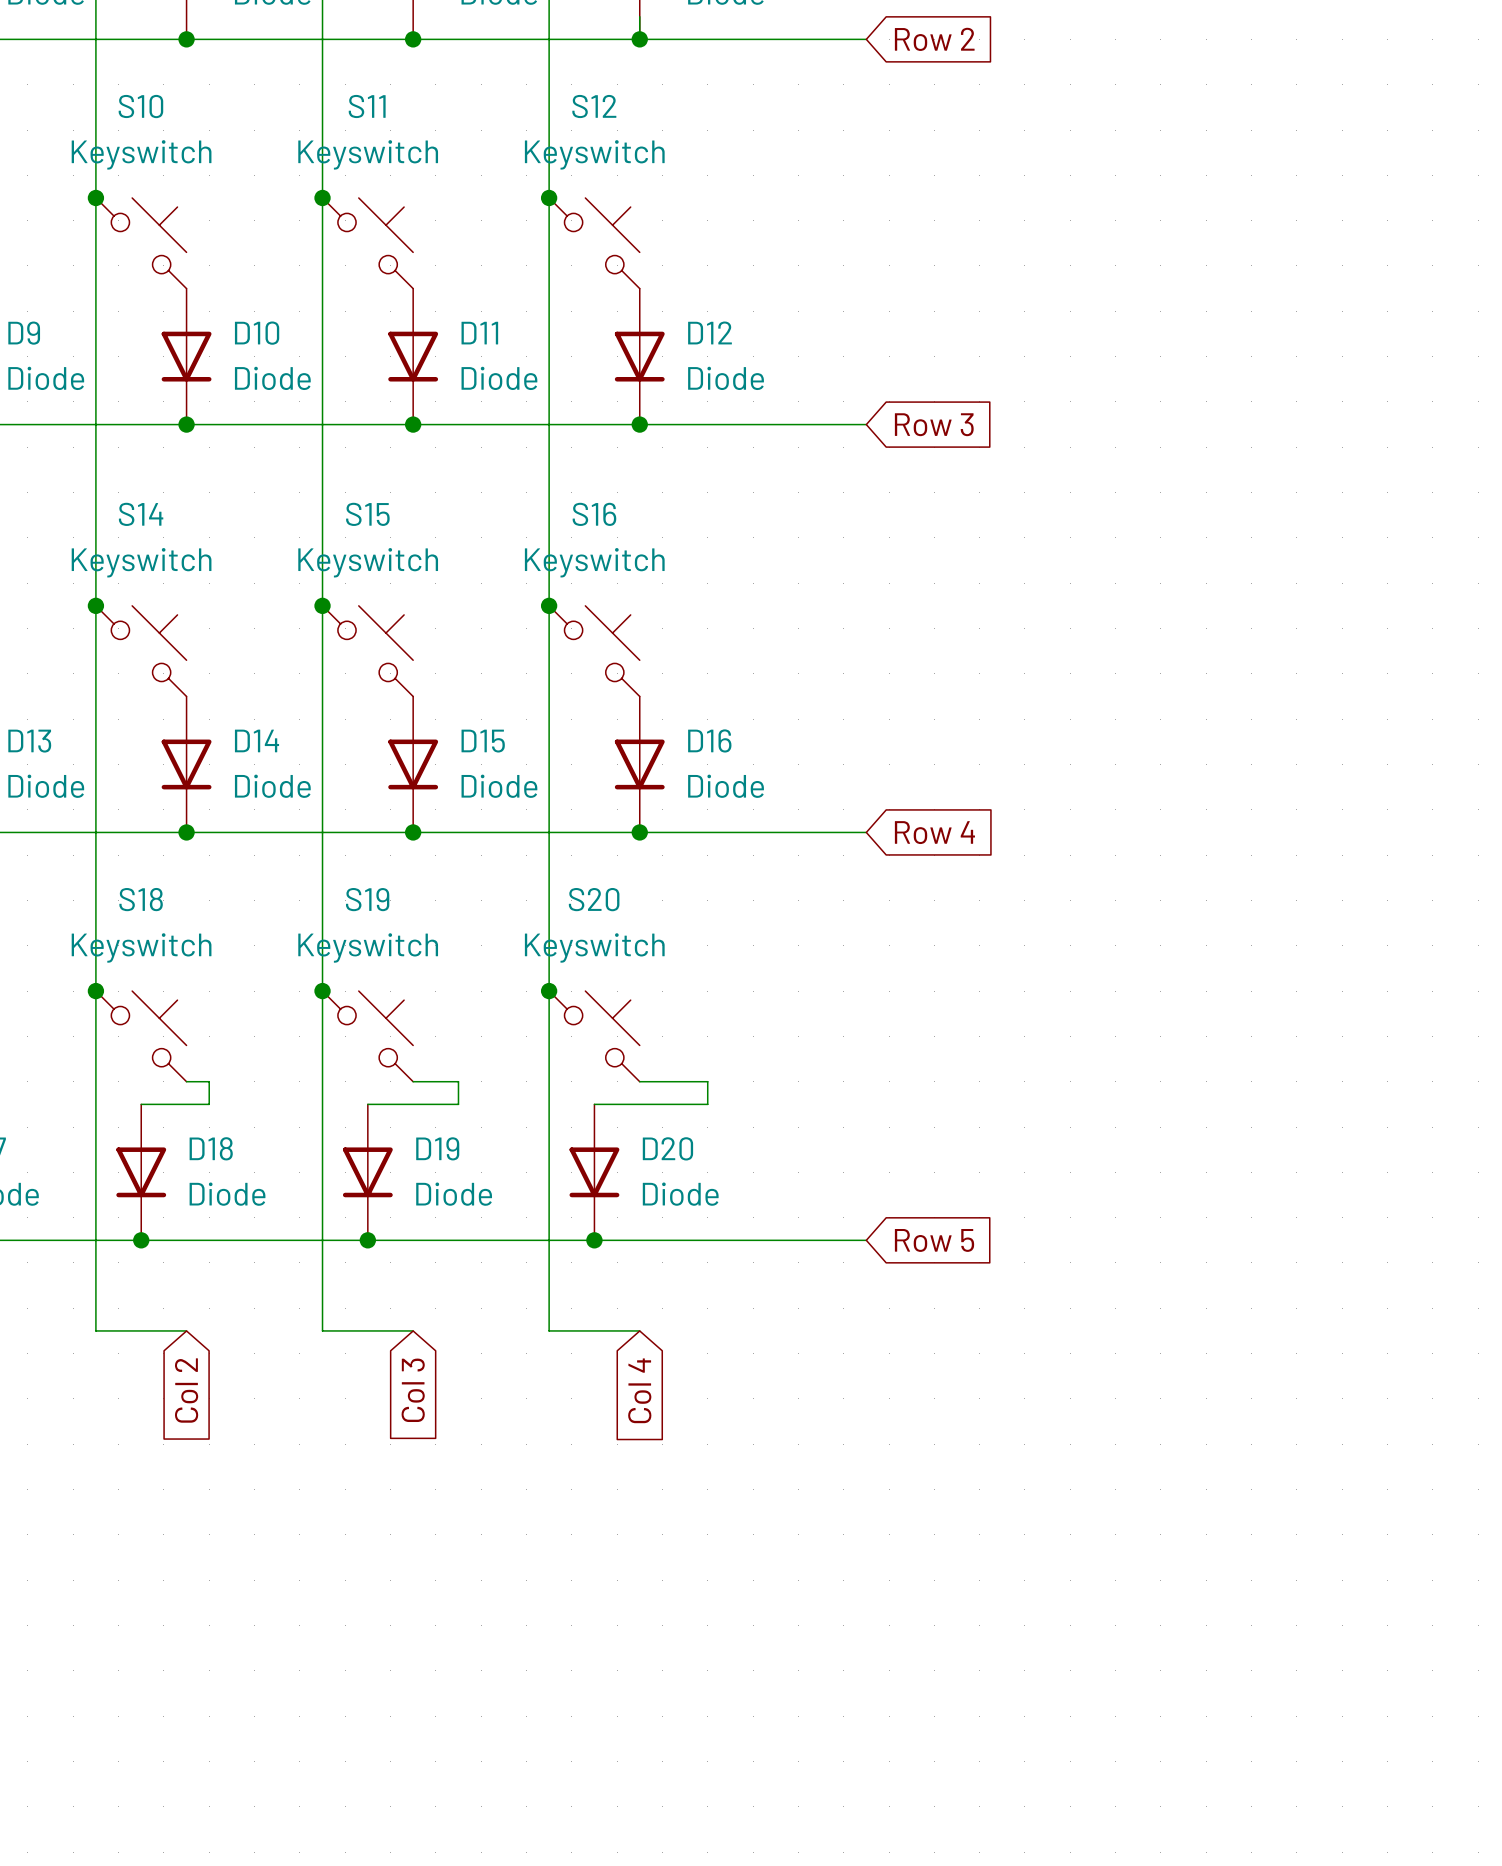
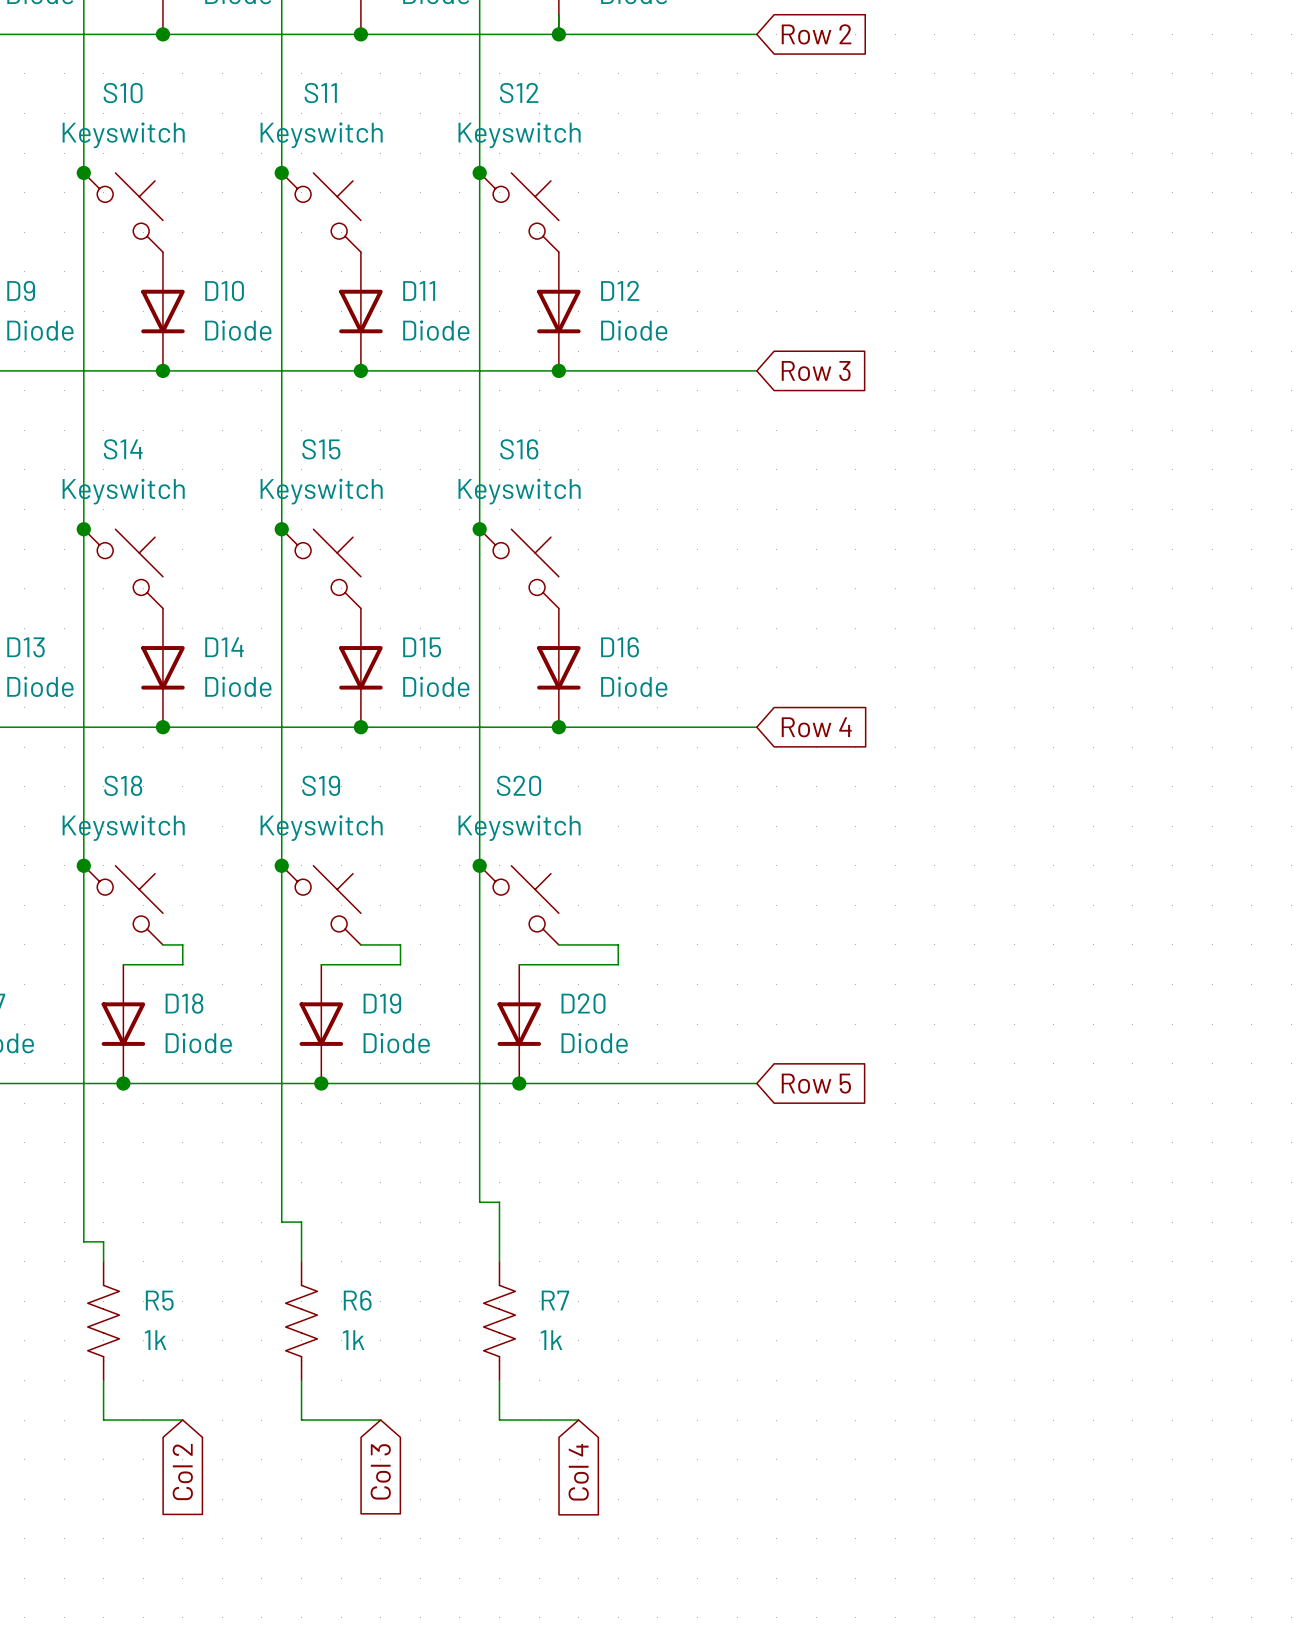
wire: (95, 1330) (186, 1330) -> (83, 1162) (83, 1241) (103, 1241) (103, 1261)
wire: (322, 1330) (413, 1330) -> (281, 1162) (281, 1222) (301, 1222) (301, 1261)
wire: (549, 1330) (639, 1330) -> (479, 1162) (479, 1202) (499, 1202) (499, 1261)
global label position: Col 2 (186, 1390) -> Col 2 (182, 1472)
global label position: Col 3 (413, 1390) -> Col 3 (380, 1471)
global label position: Col 4 (639, 1390) -> Col 4 (578, 1472)
R5: none -> 1k (103, 1321)
R6: none -> 1k (301, 1321)
R7: none -> 1k (499, 1321)
wire: none -> (103, 1380) (103, 1420) (182, 1420)
wire: none -> (301, 1380) (301, 1420) (380, 1420)
wire: none -> (499, 1380) (499, 1420) (578, 1420)

